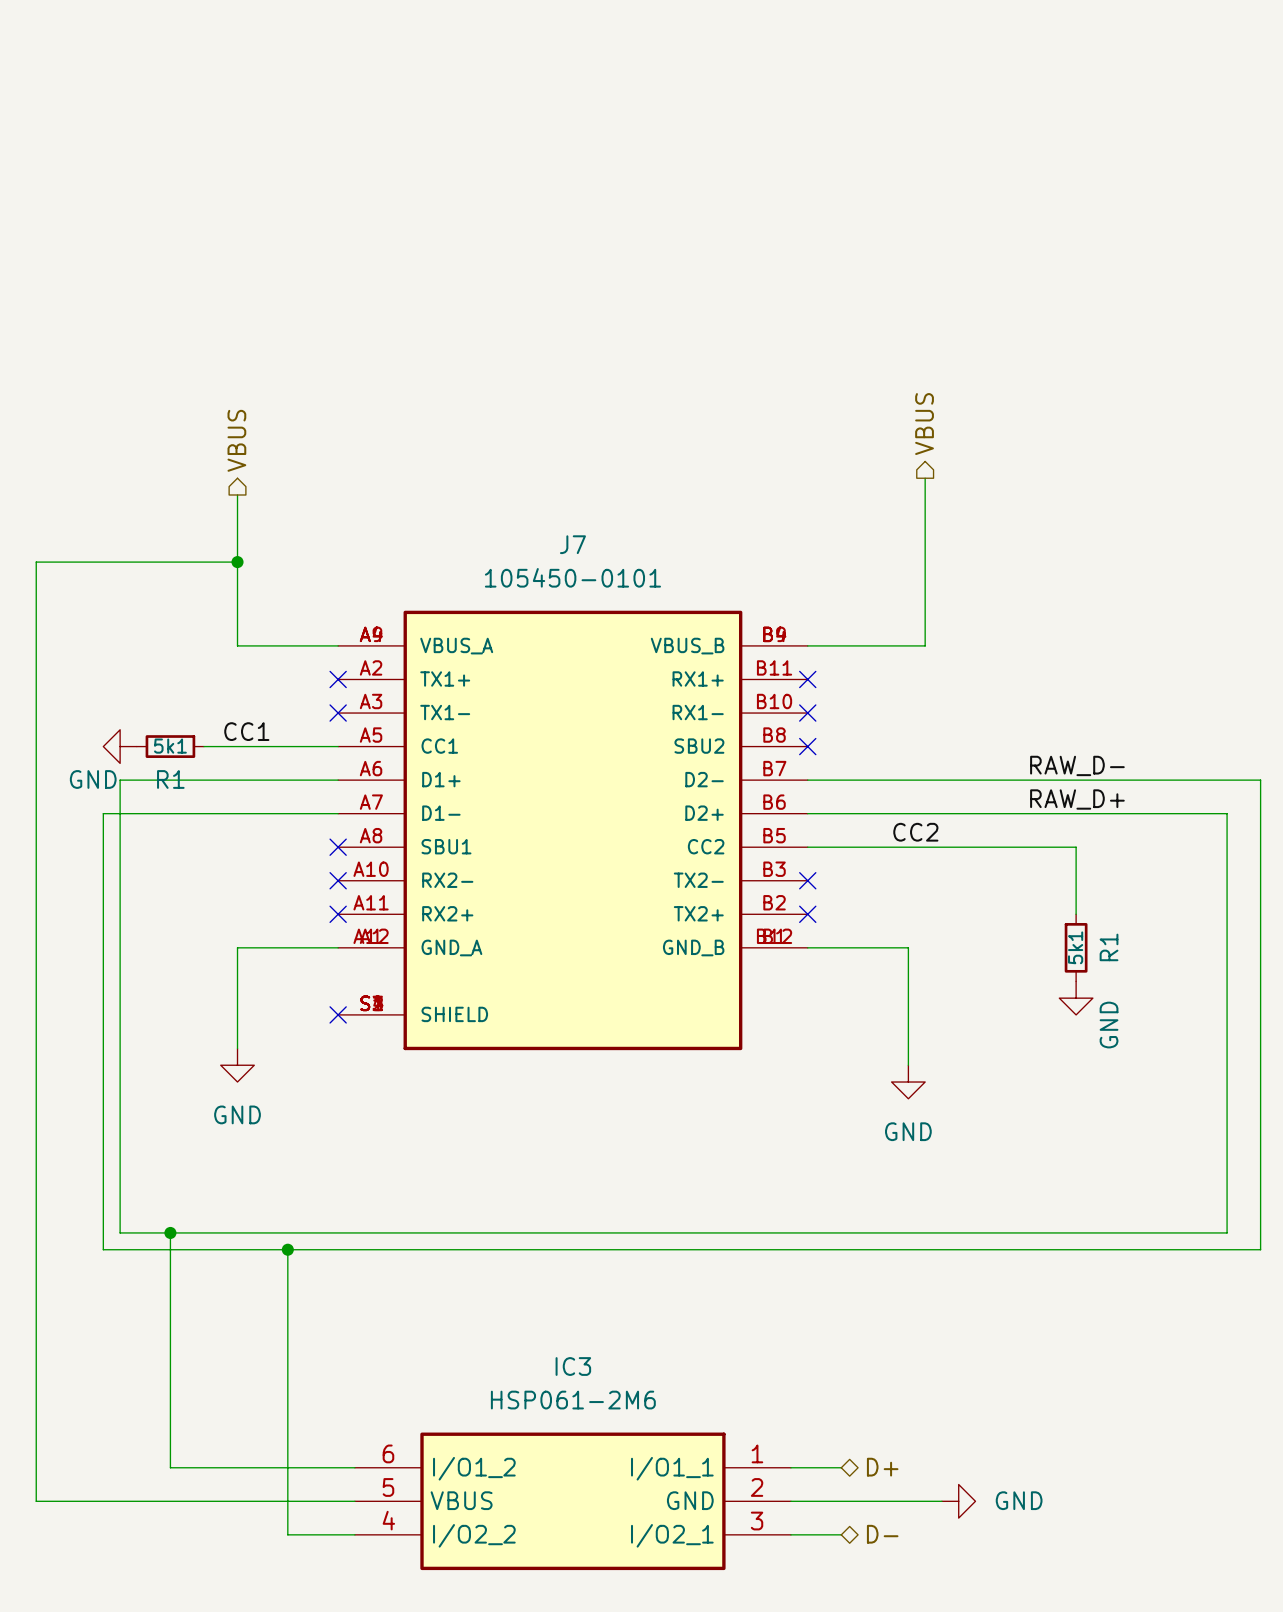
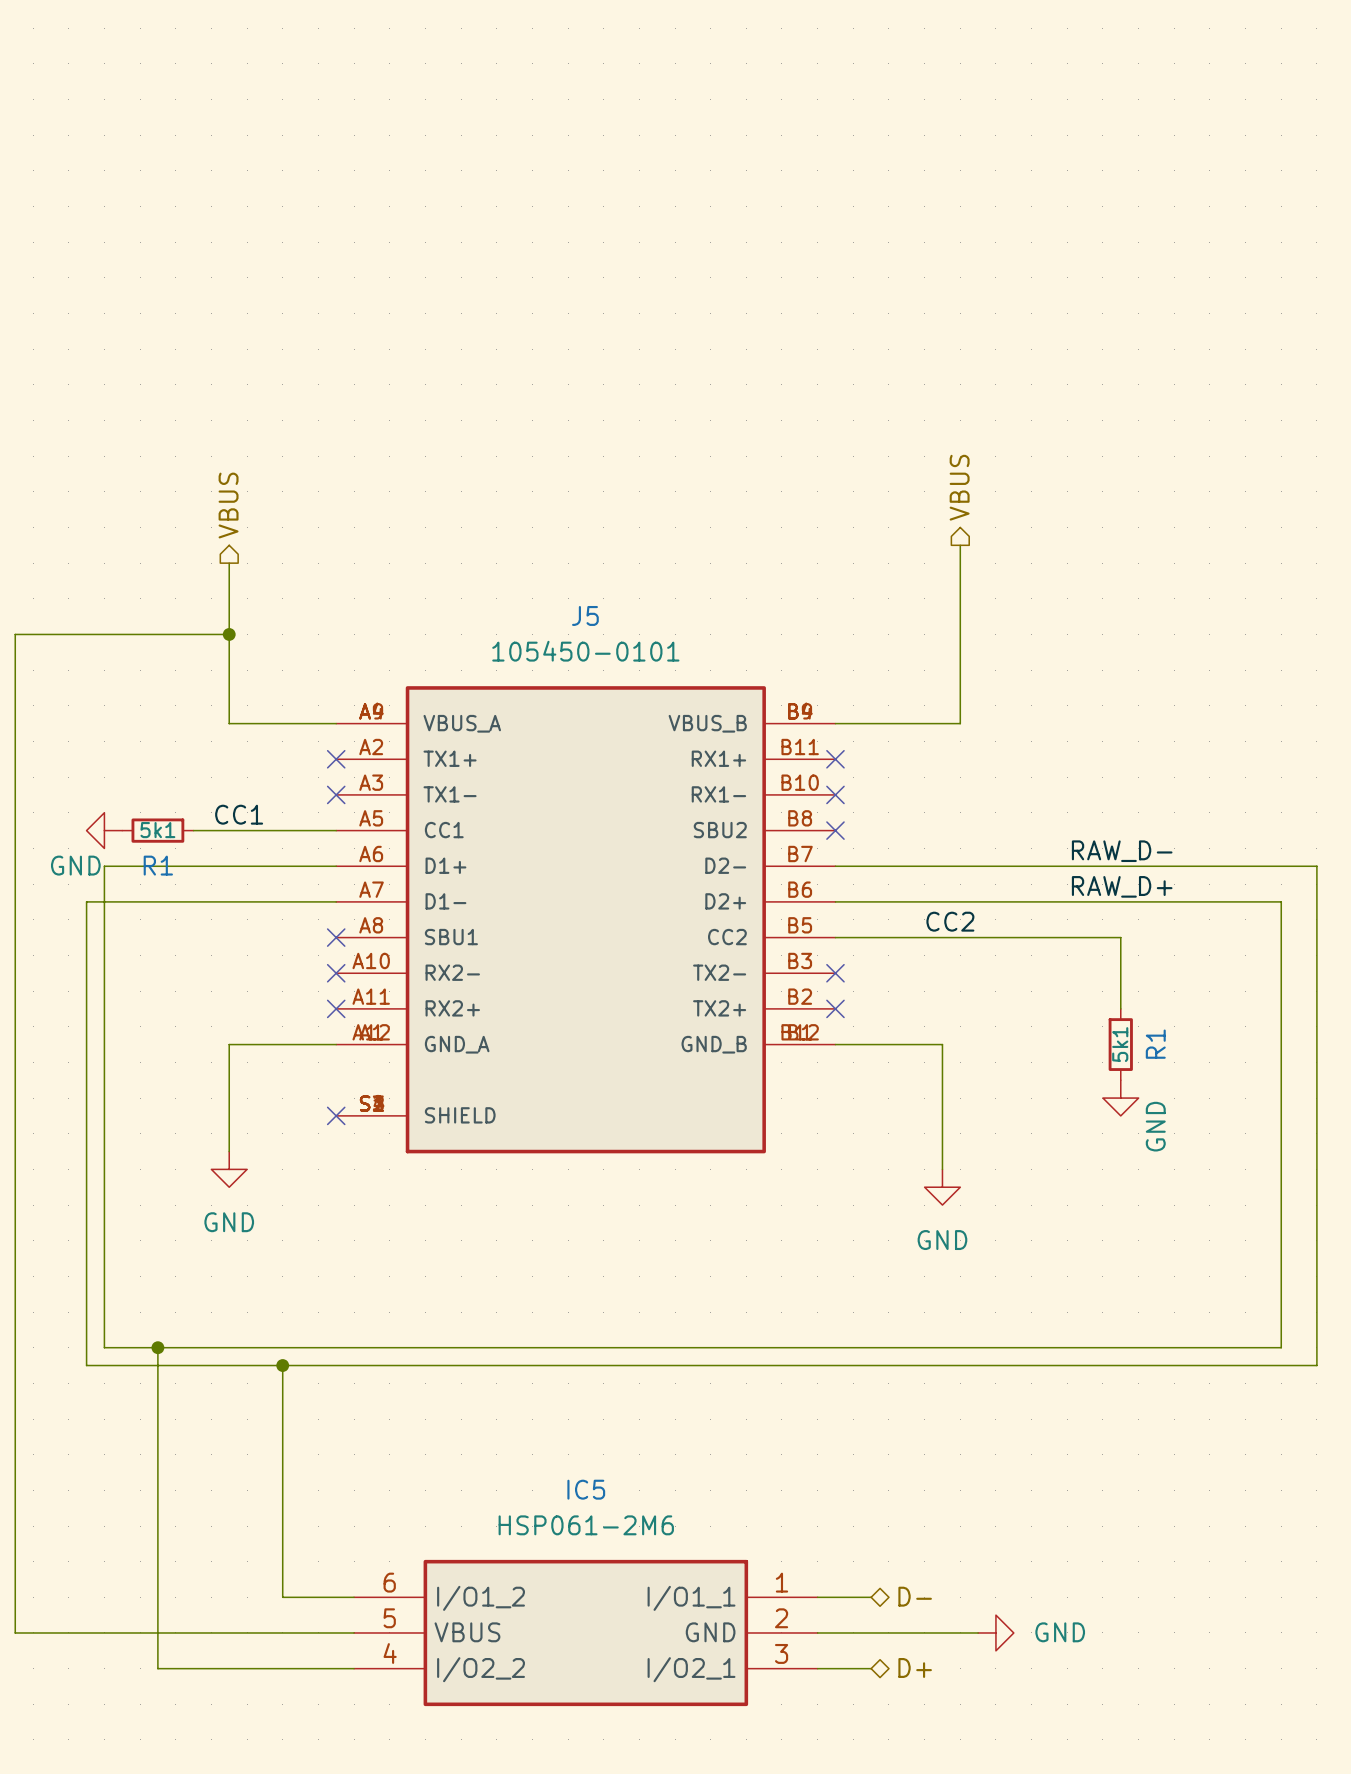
J7 name: J7 (572, 544) -> J5 (585, 615)
IC3 name: IC3 (573, 1366) -> IC5 (586, 1489)
wire: (170, 1467) (287, 1467) (287, 1534) -> (157, 1597) (157, 1668) (282, 1668)
hierarchical label: D+ (882, 1467) -> D- (915, 1596)
hierarchical label: D- (882, 1534) -> D+ (915, 1667)

